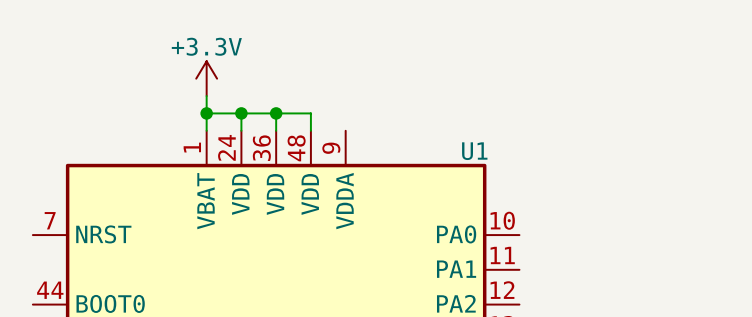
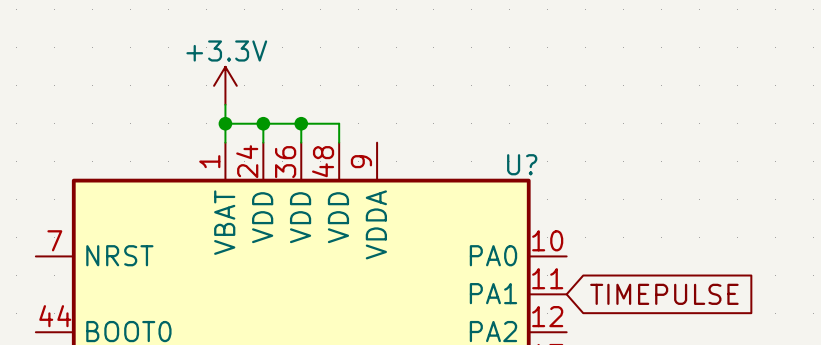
U1 name: U1 (474, 151) -> U? (522, 164)
global label: none -> TIMEPULSE (664, 294)

